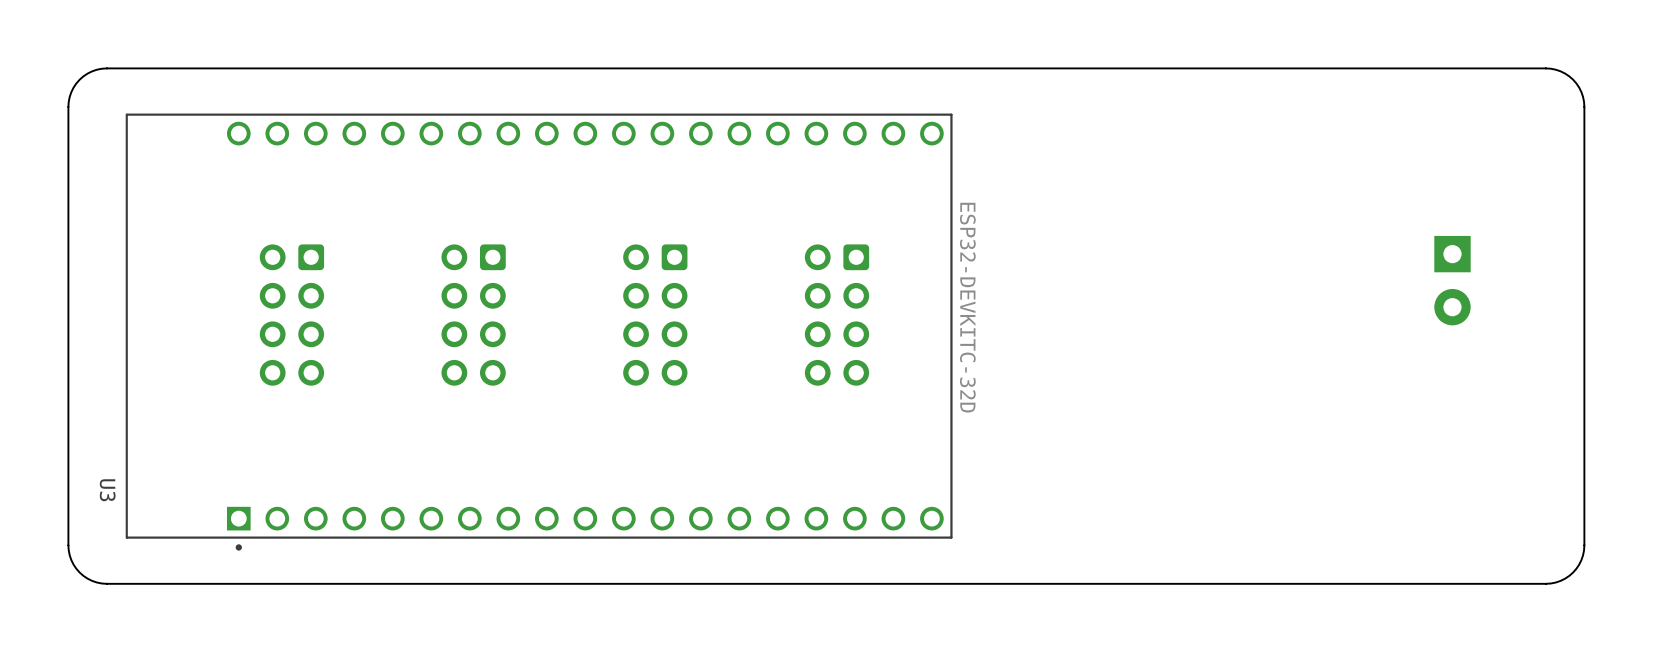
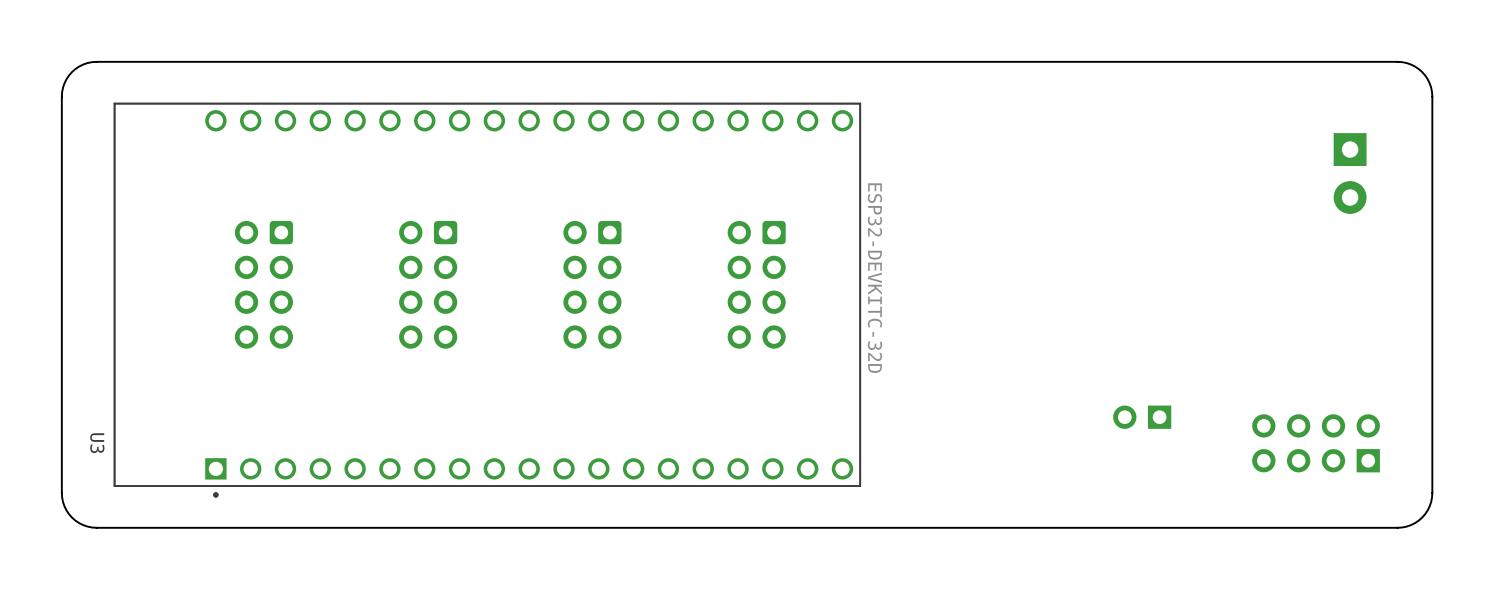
part position: (1452, 280) -> (1350, 173)
part: none -> (1142, 417)
part: none -> (1316, 443)

